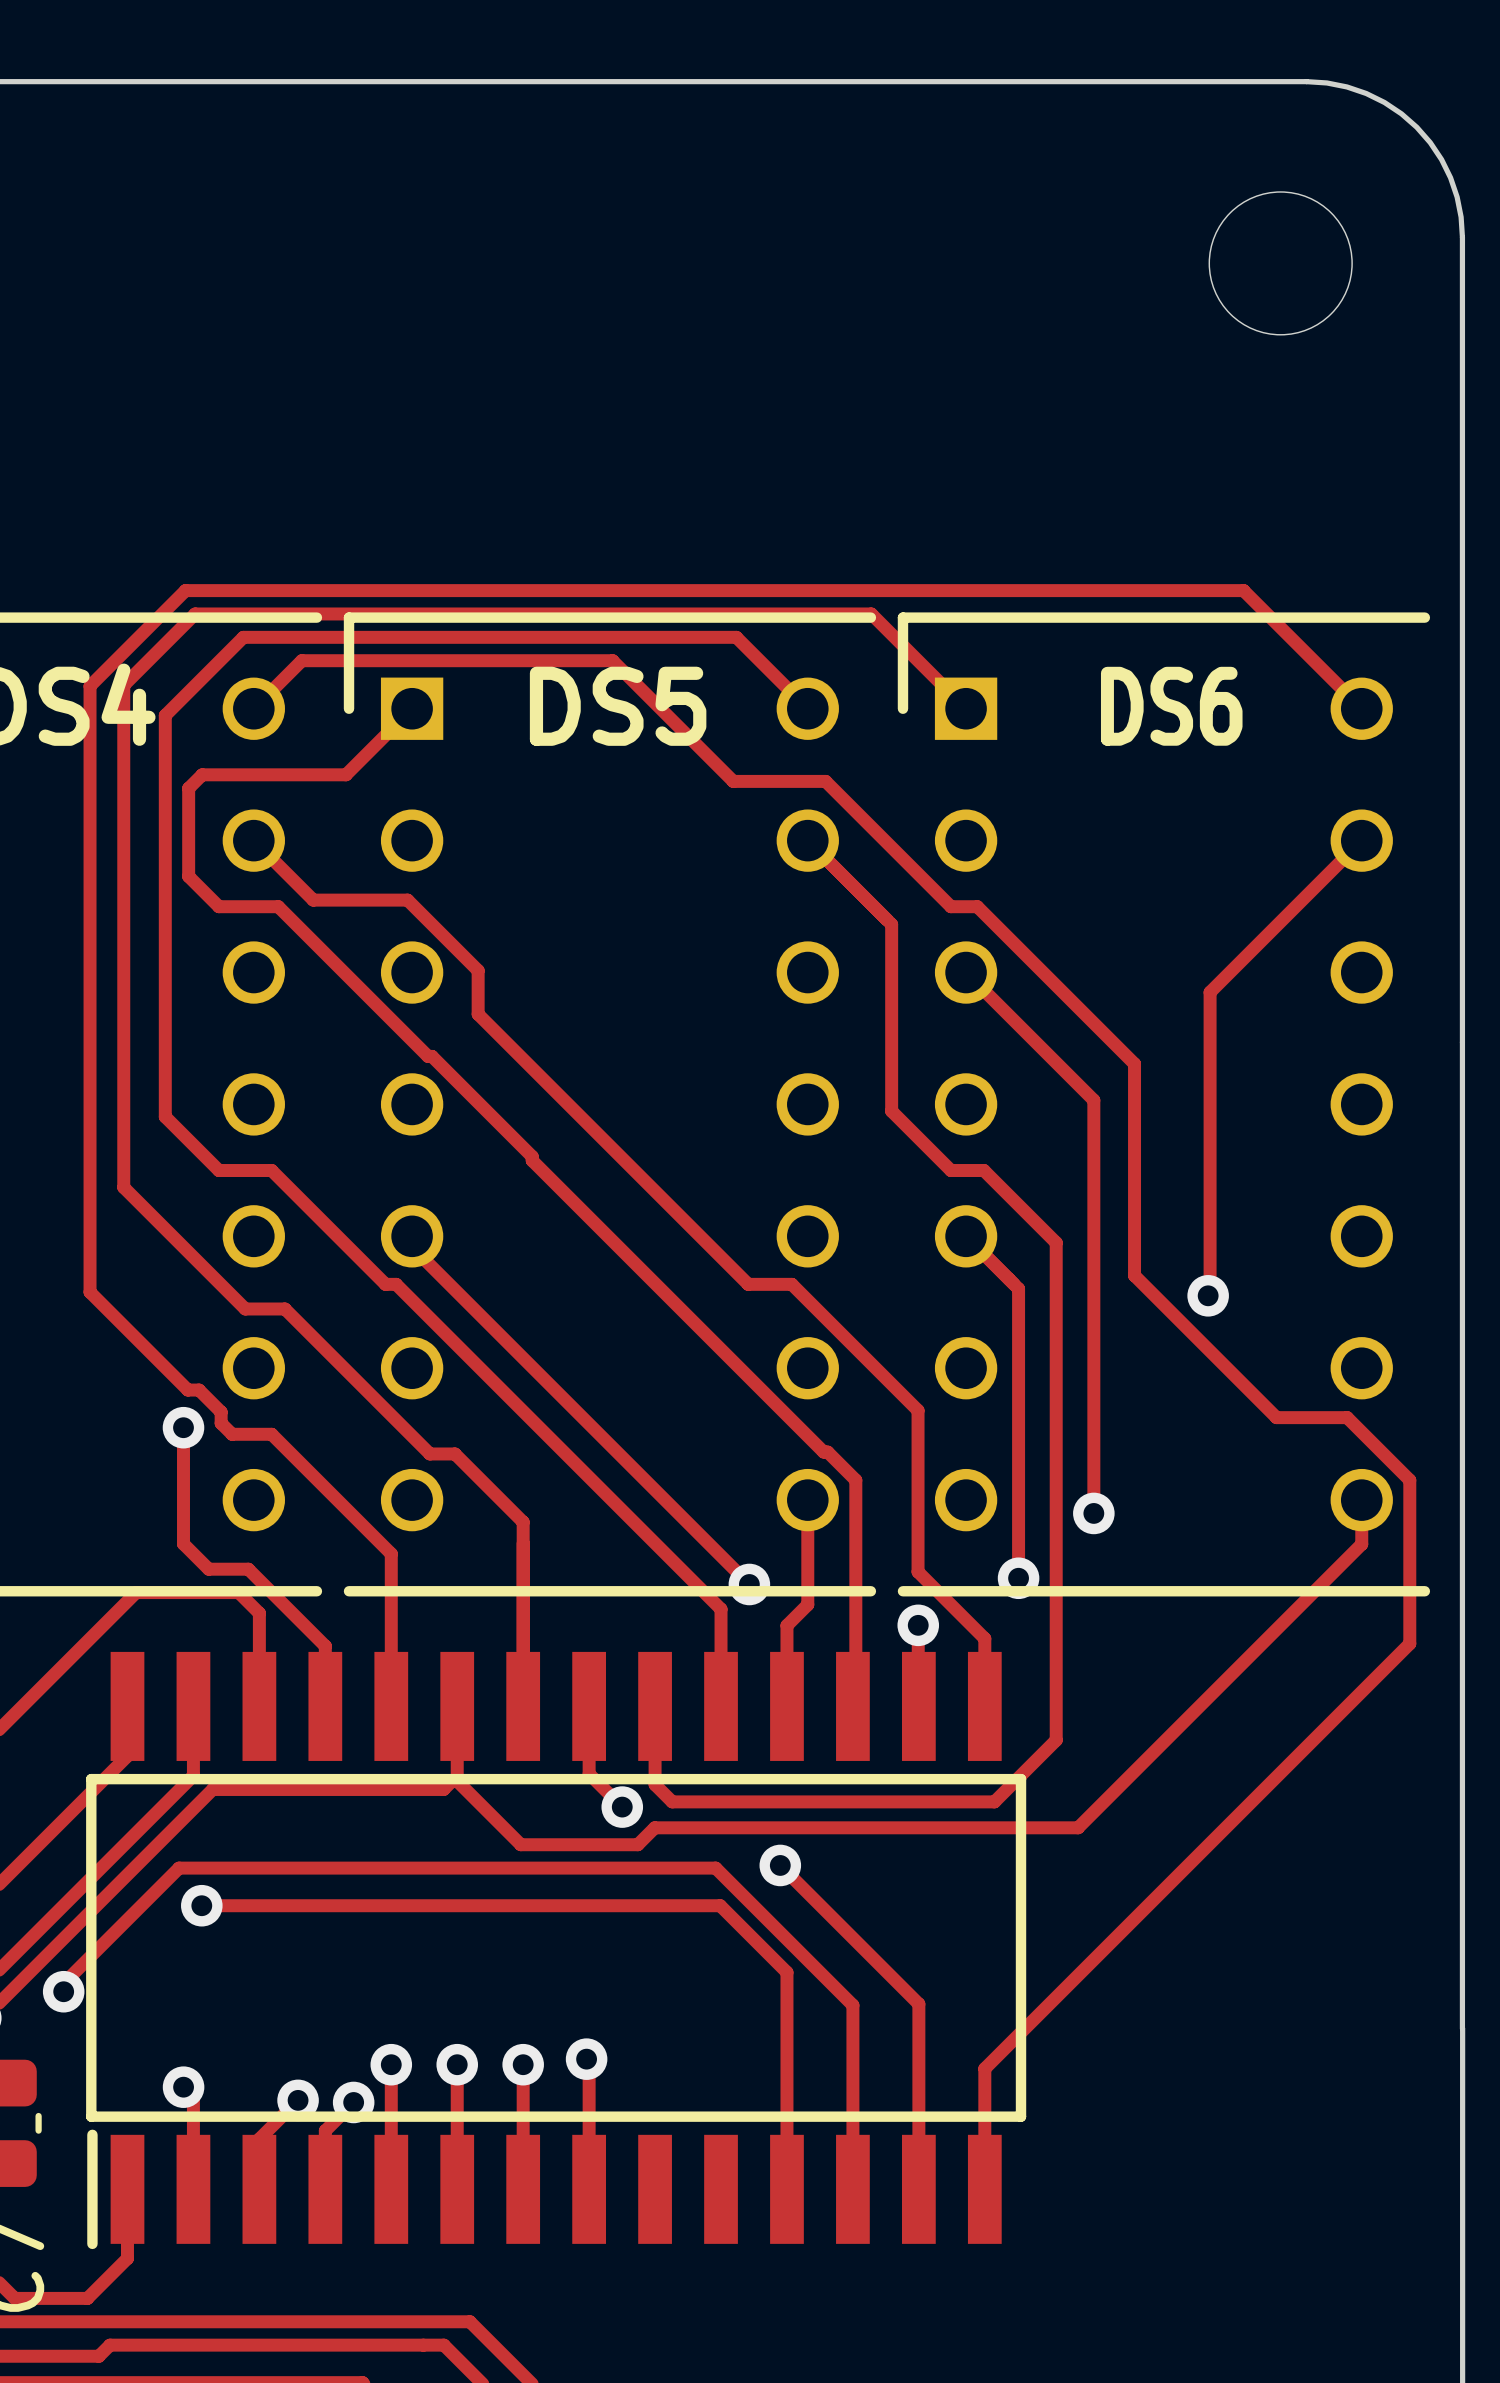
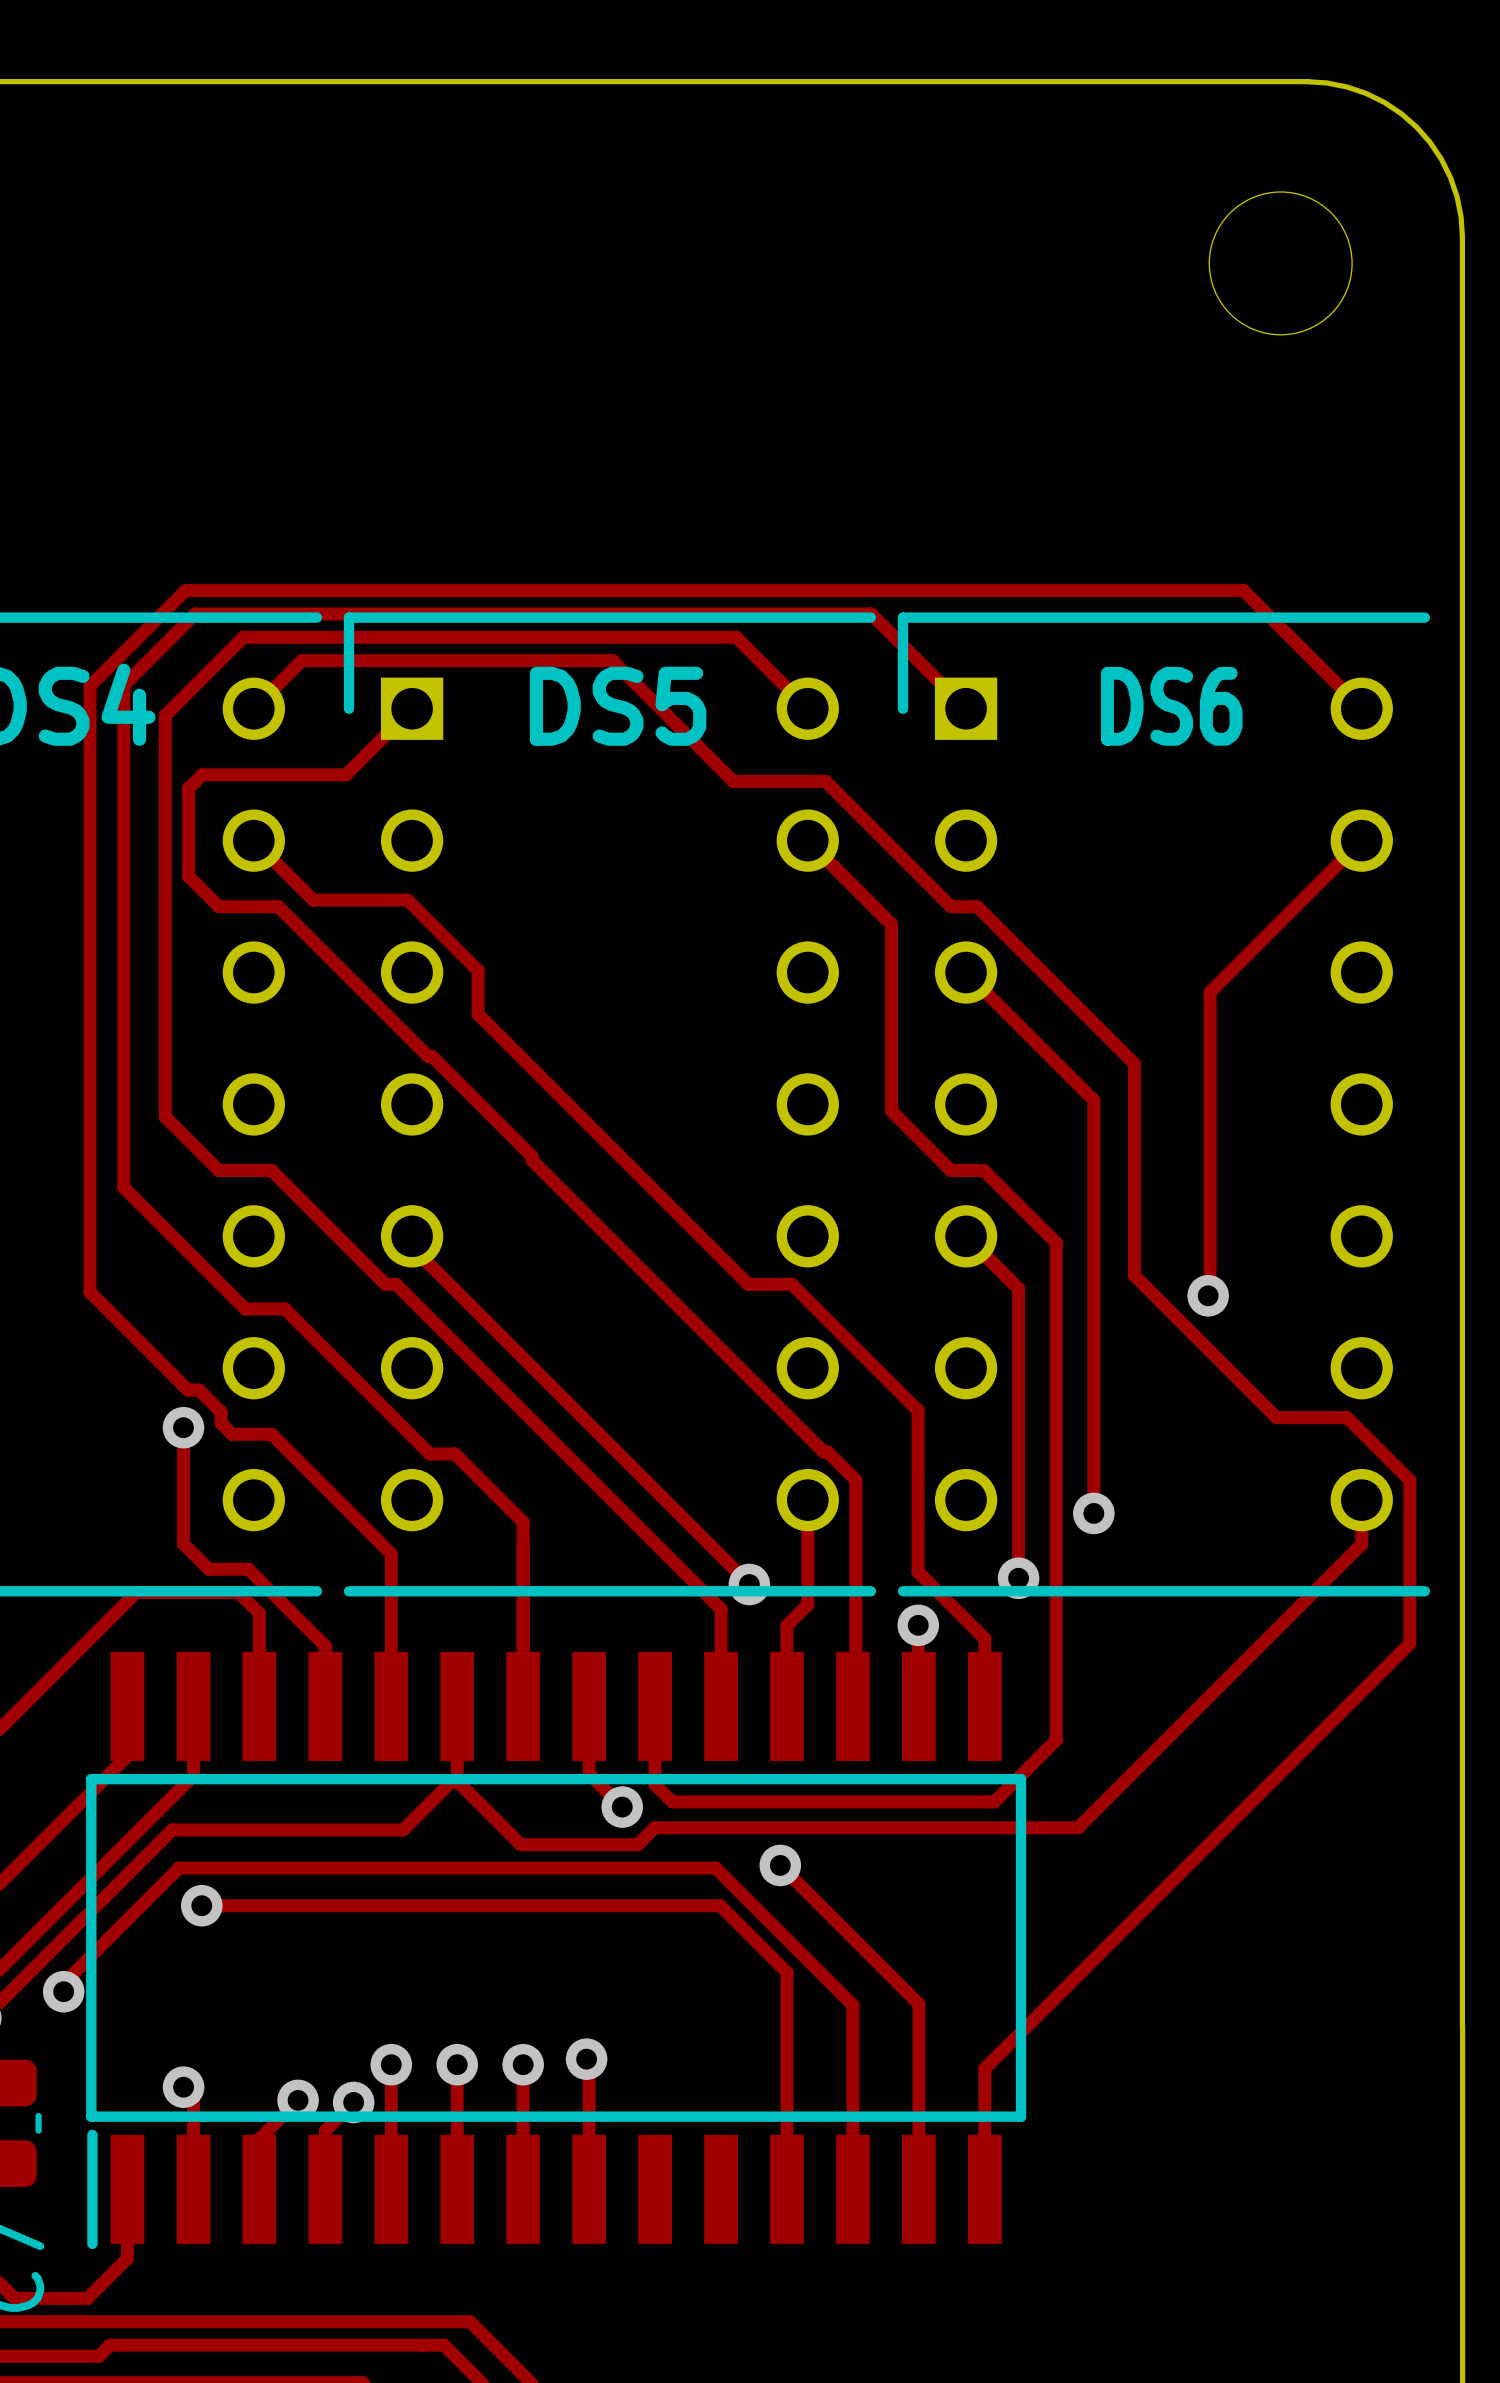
track: (443, 1789) (212, 1789) (172, 1829) -> (443, 1789) (403, 1829) (172, 1829)

